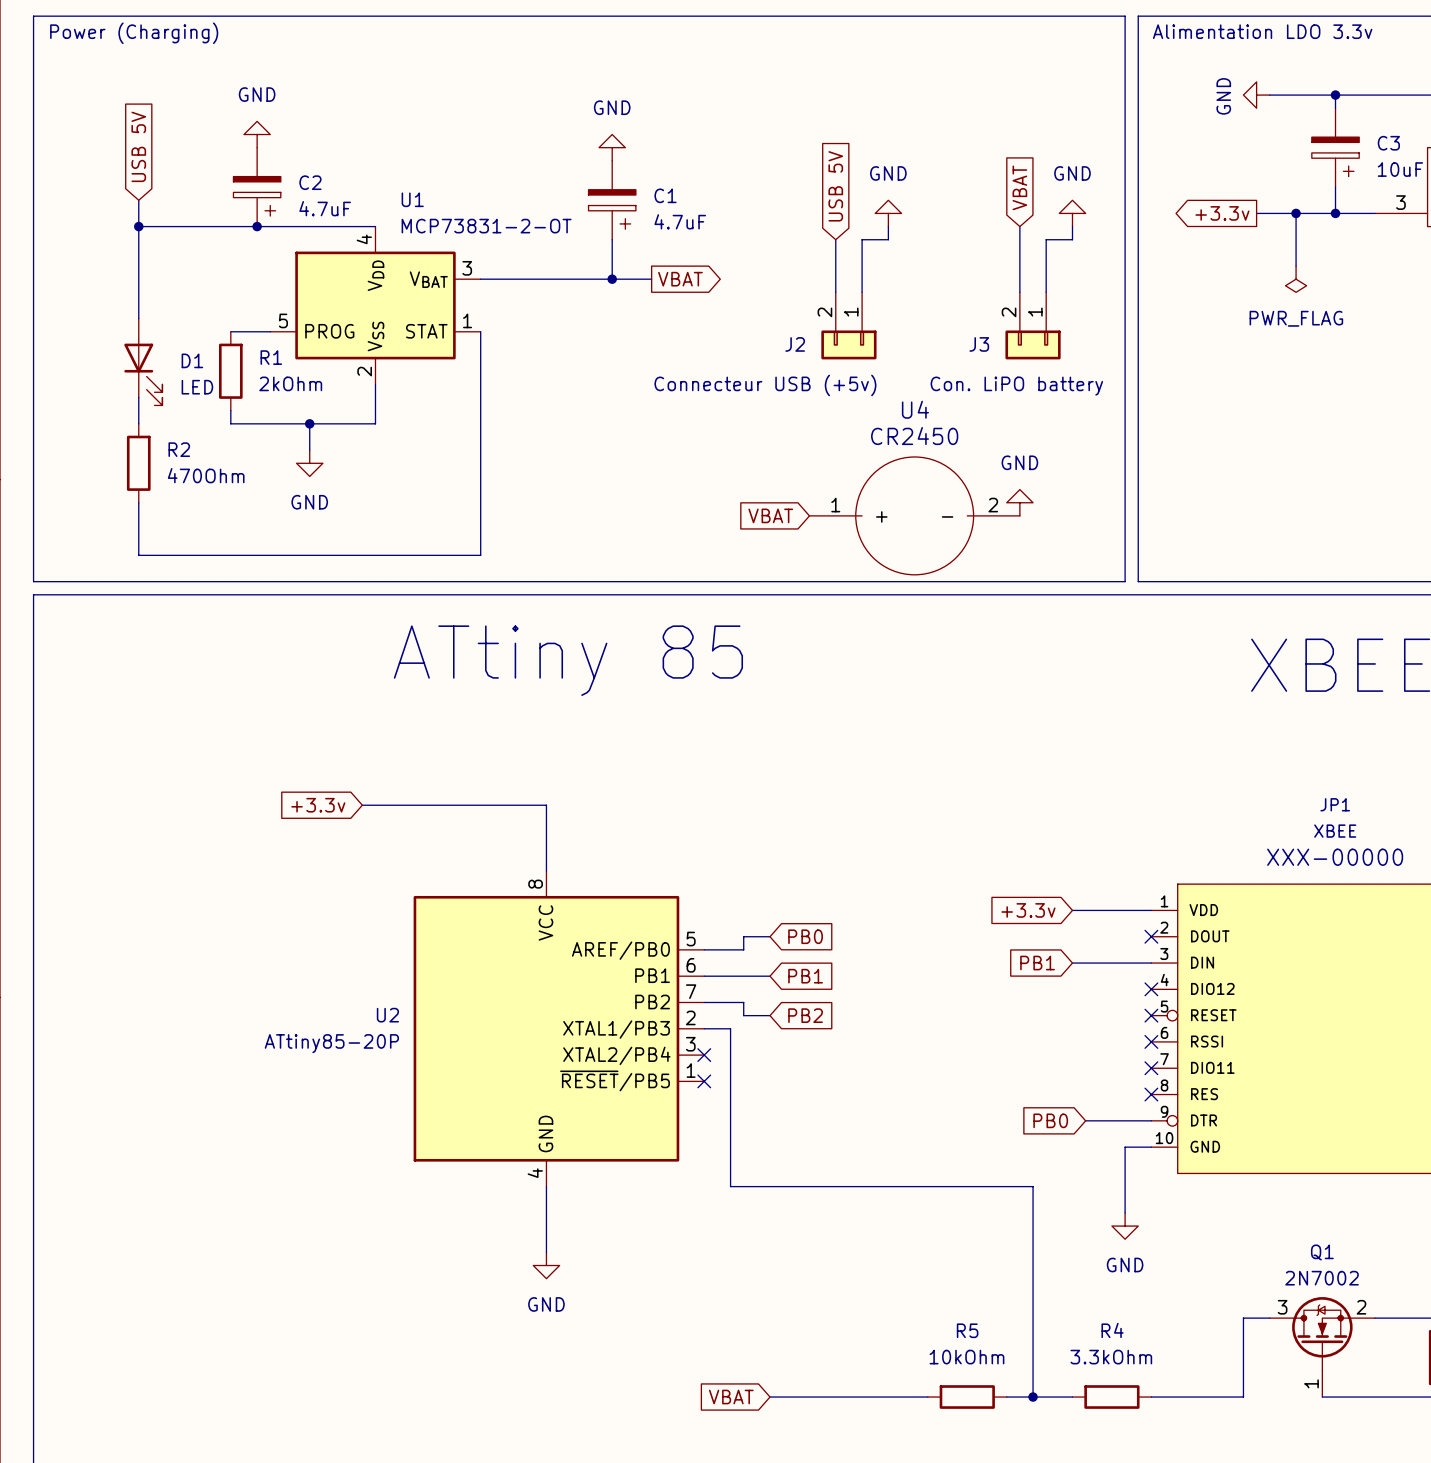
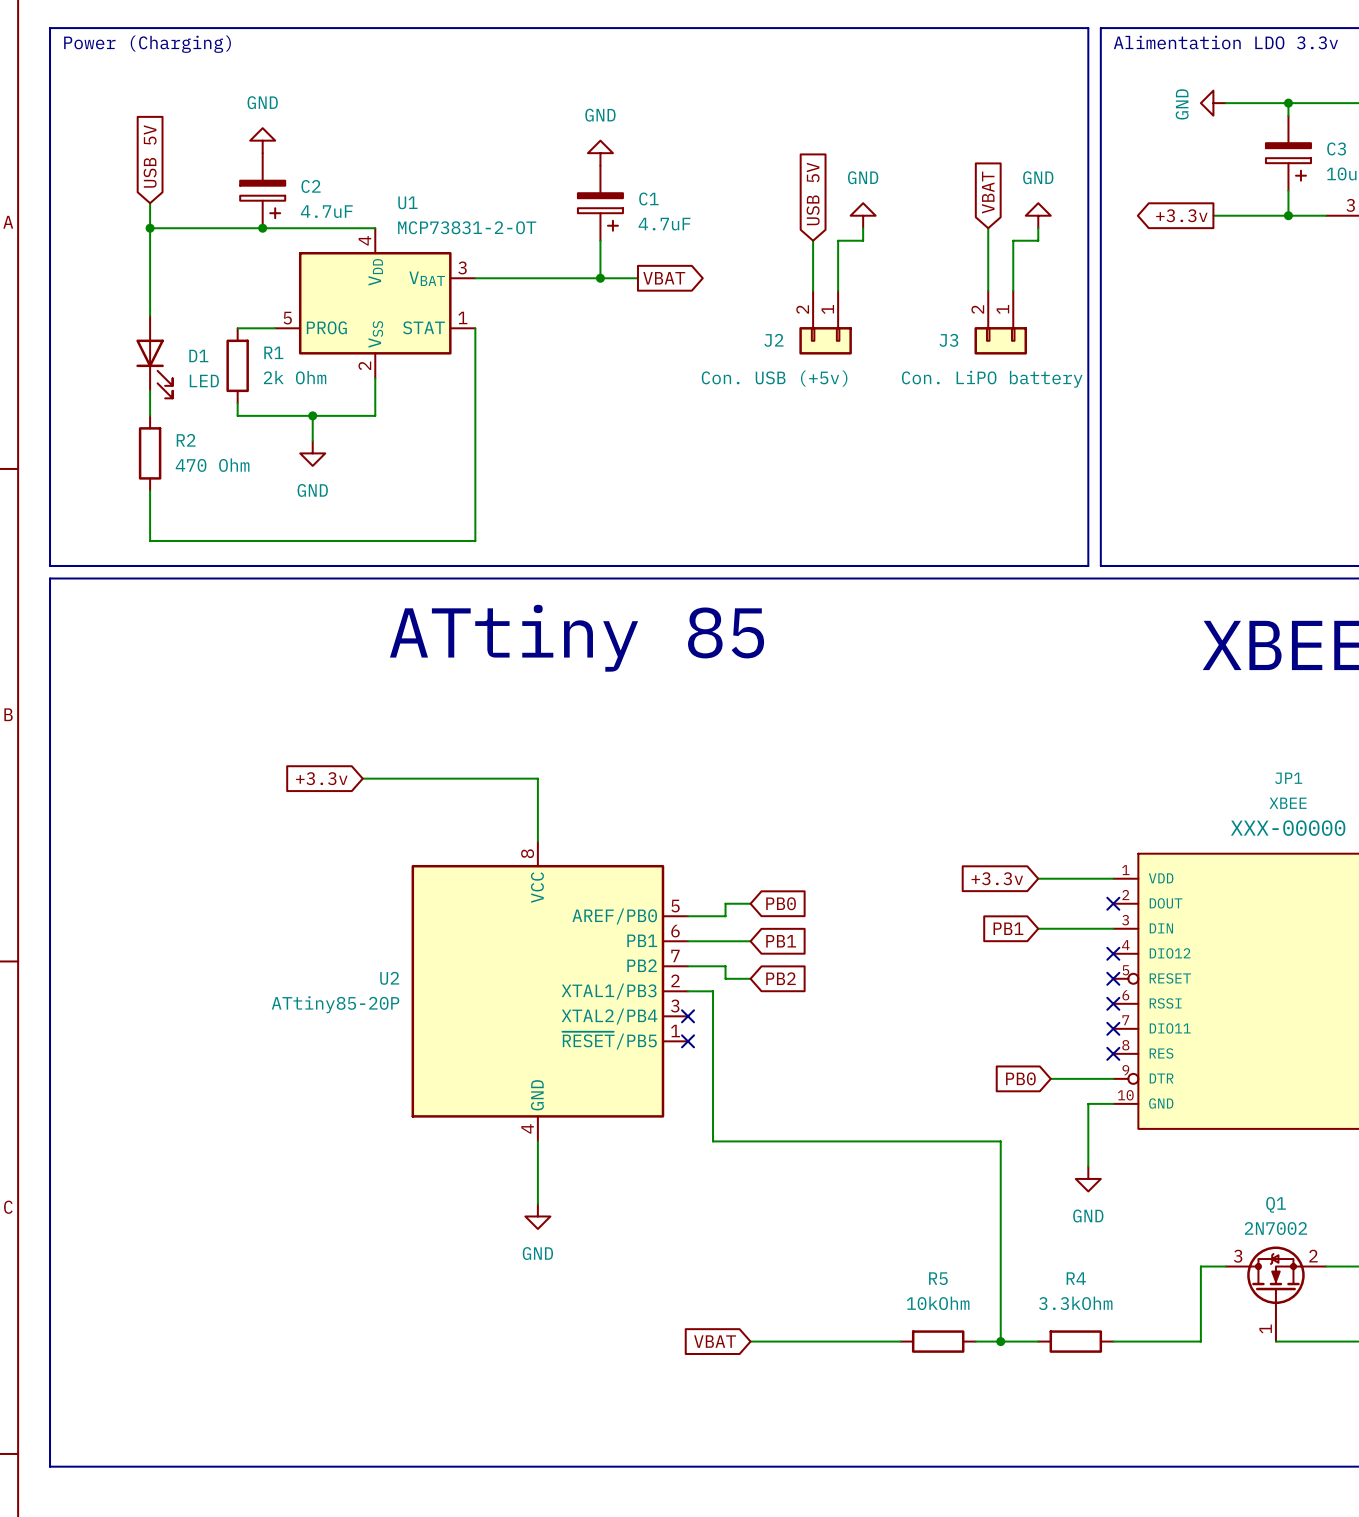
wire: (1296, 213) (1296, 266) -> none
junction: (1296, 213) -> none
power symbol: PWR_FLAG (1296, 279) -> none
R1 value: 2kOhm (290, 383) -> 2k Ohm (295, 377)
J2 value: Connecteur USB (+5v) (765, 385) -> Con. USB (+5v) (774, 378)
R2 value: 470Ohm (206, 475) -> 470 Ohm (212, 465)
power symbol: GND (1019, 502) -> none
global label: VBAT (770, 515) -> none
U4: CR2450 (914, 515) -> none

